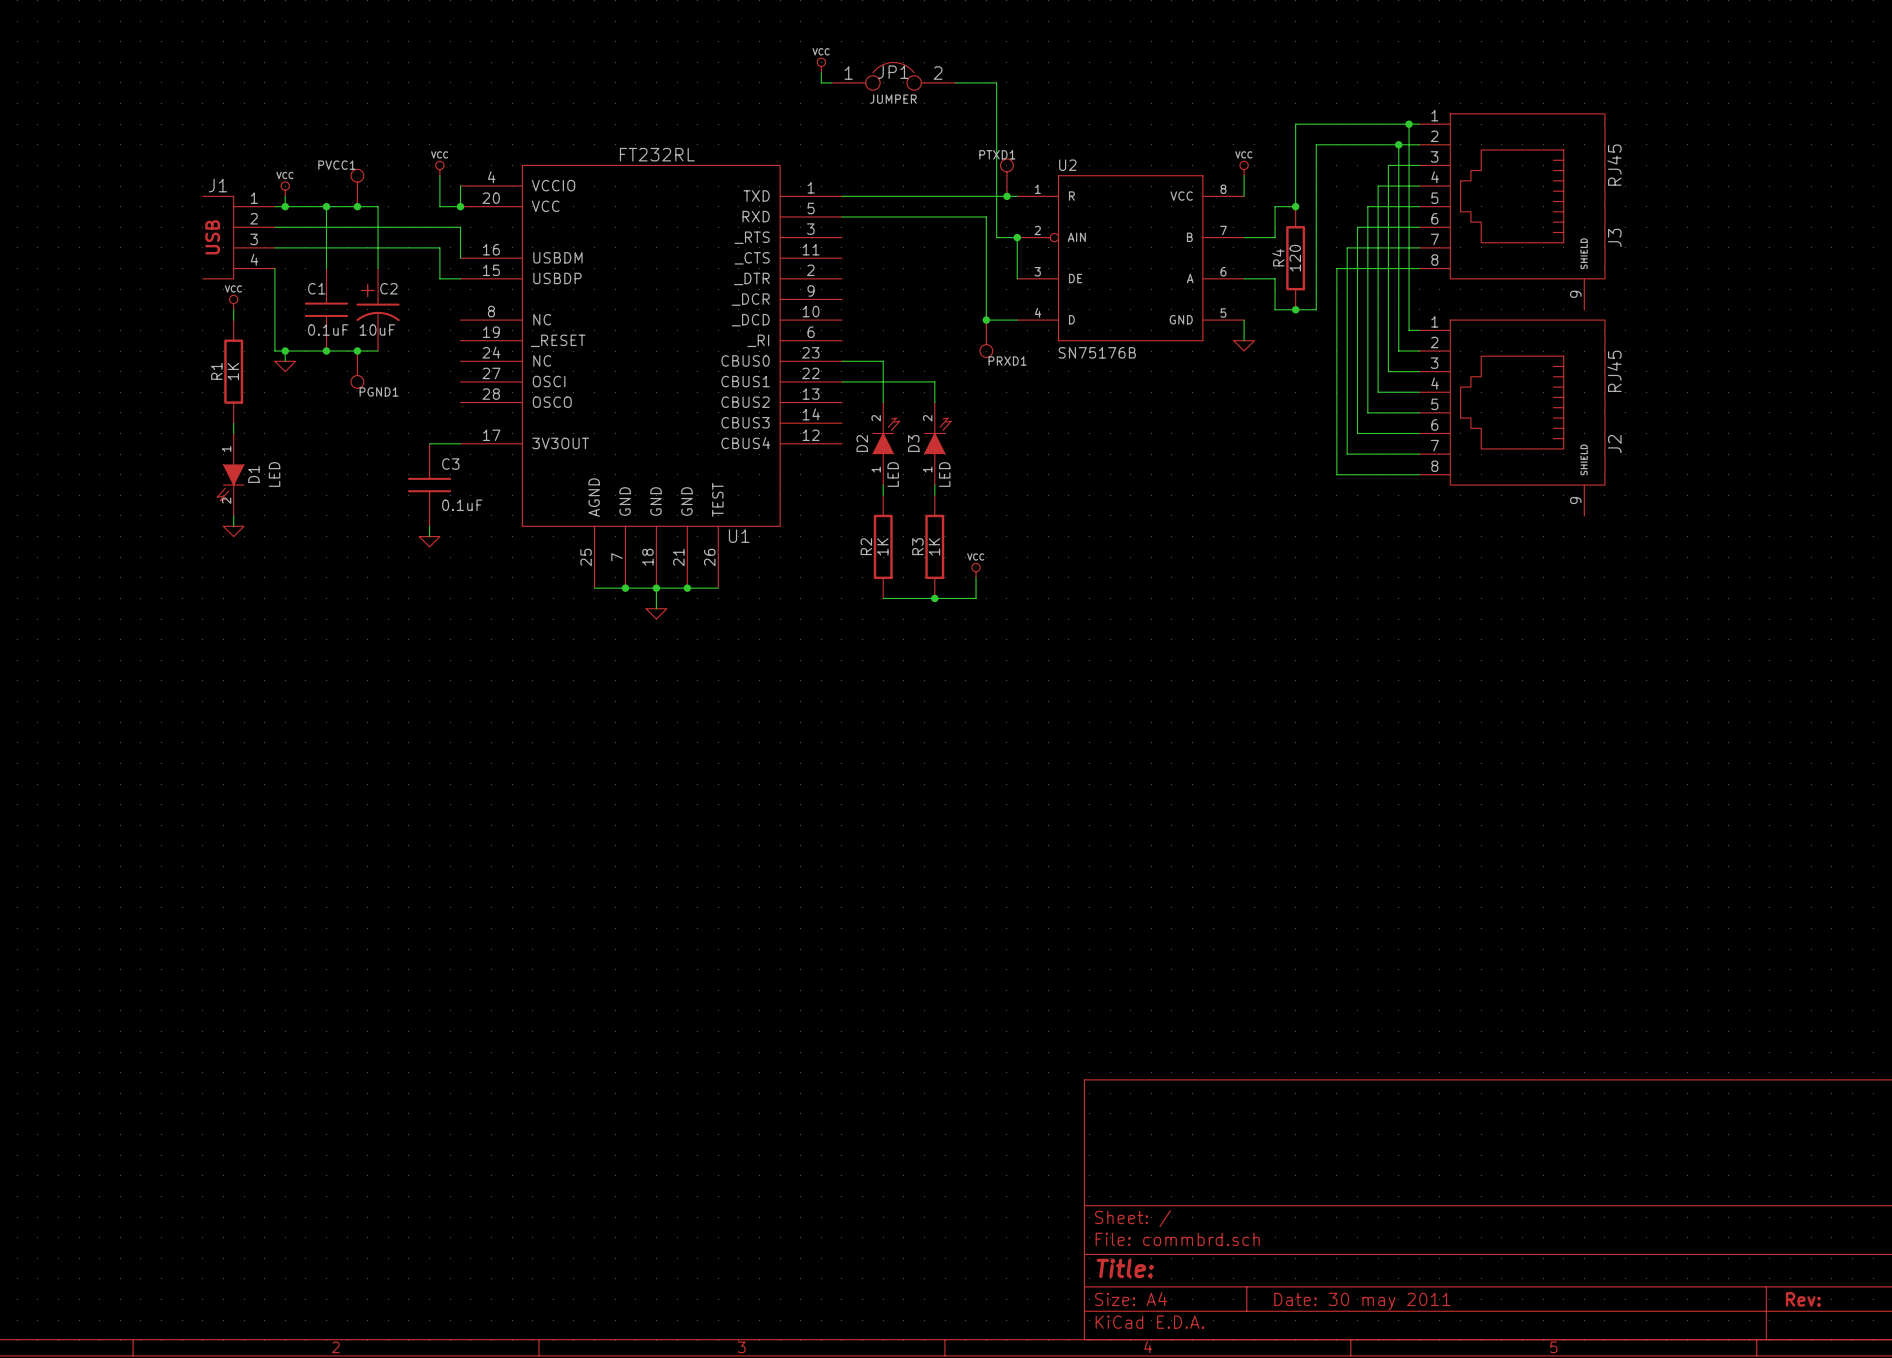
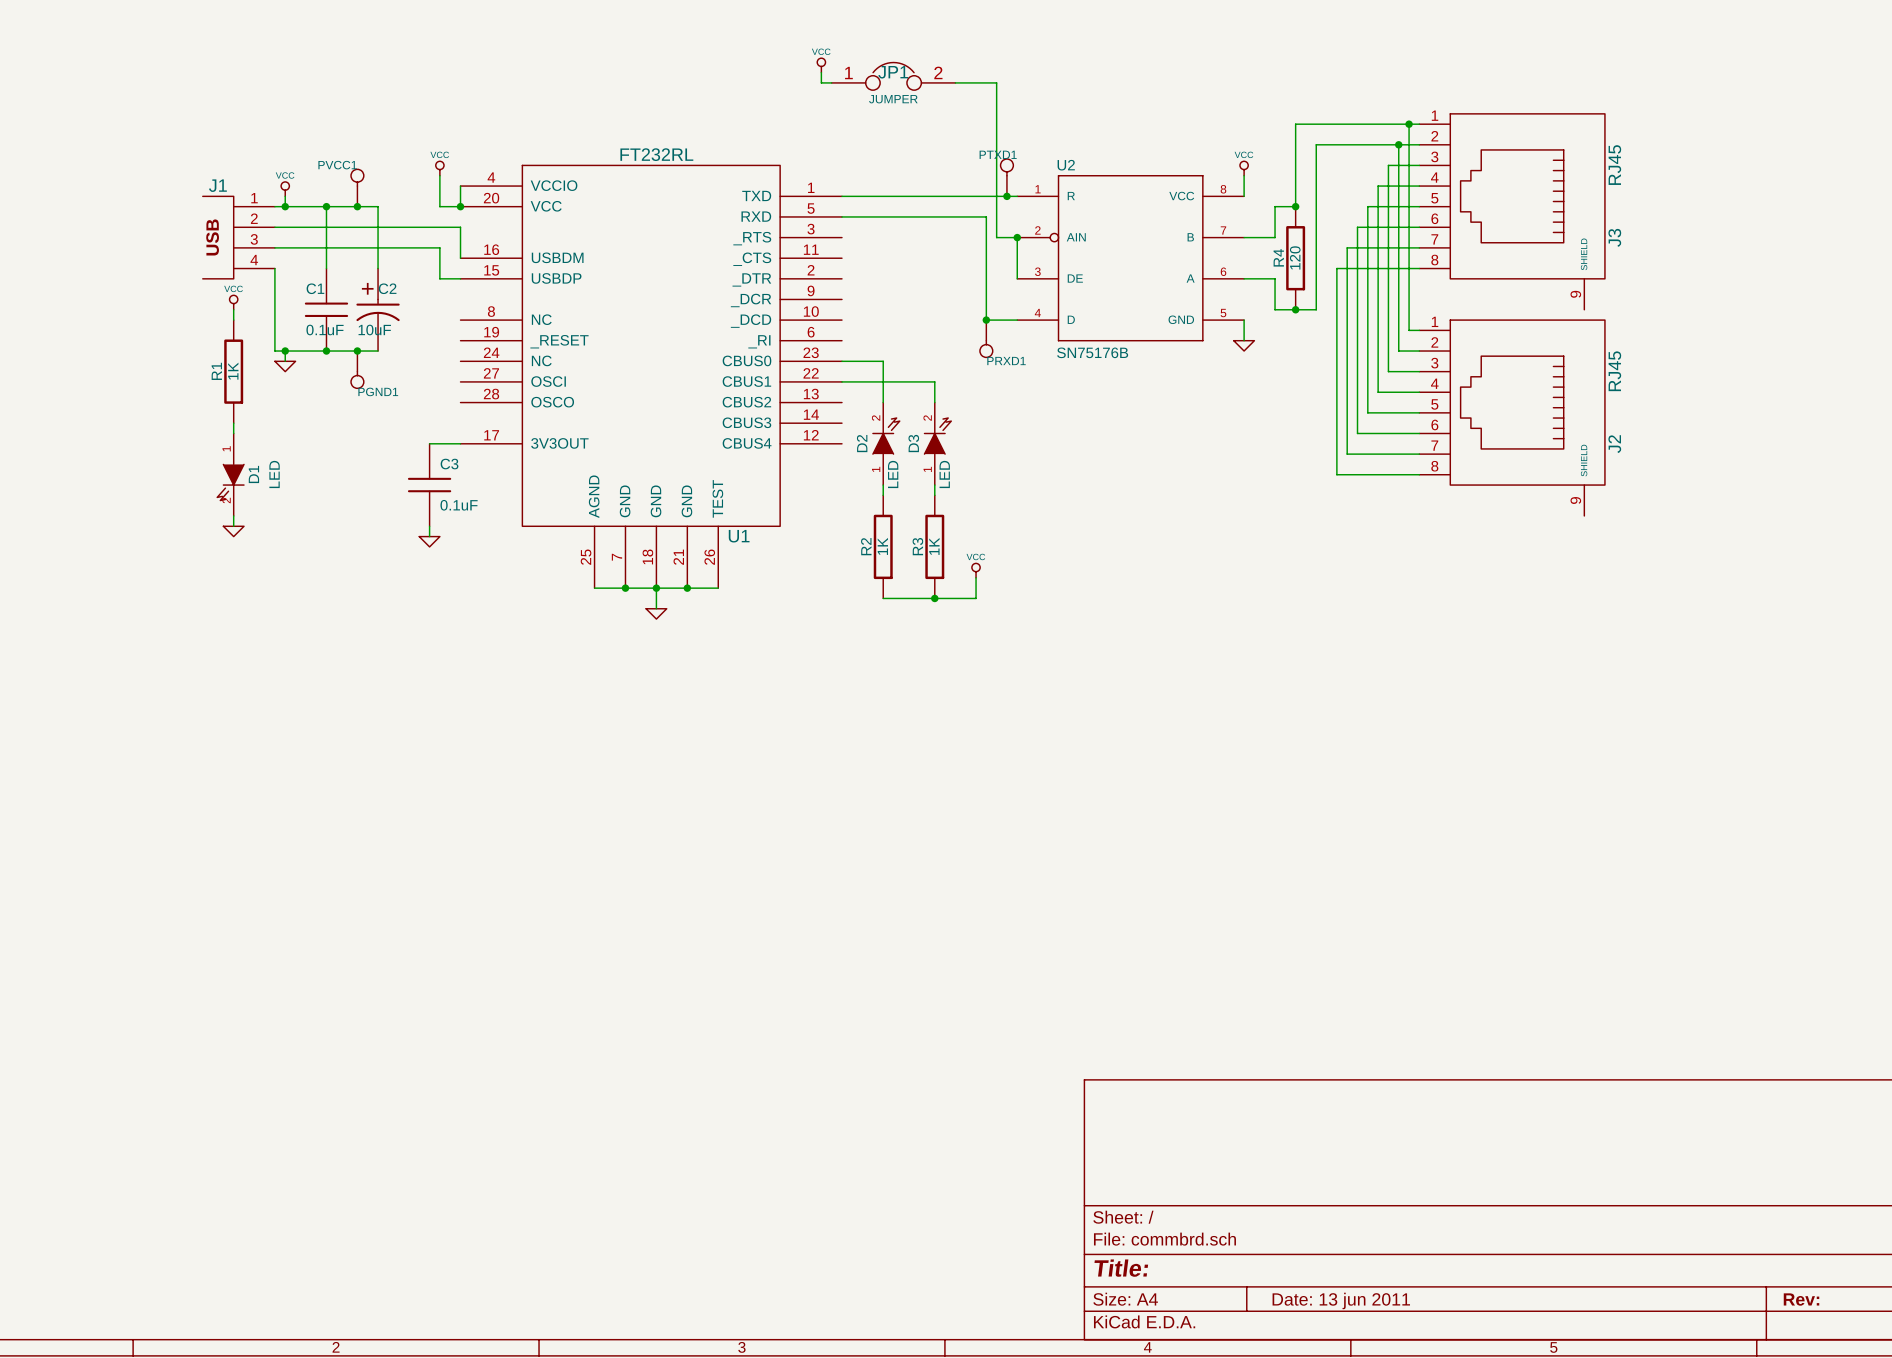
title block: Date: 30 may 2011 (1362, 1301) -> Date: 13 jun 2011 (1341, 1300)

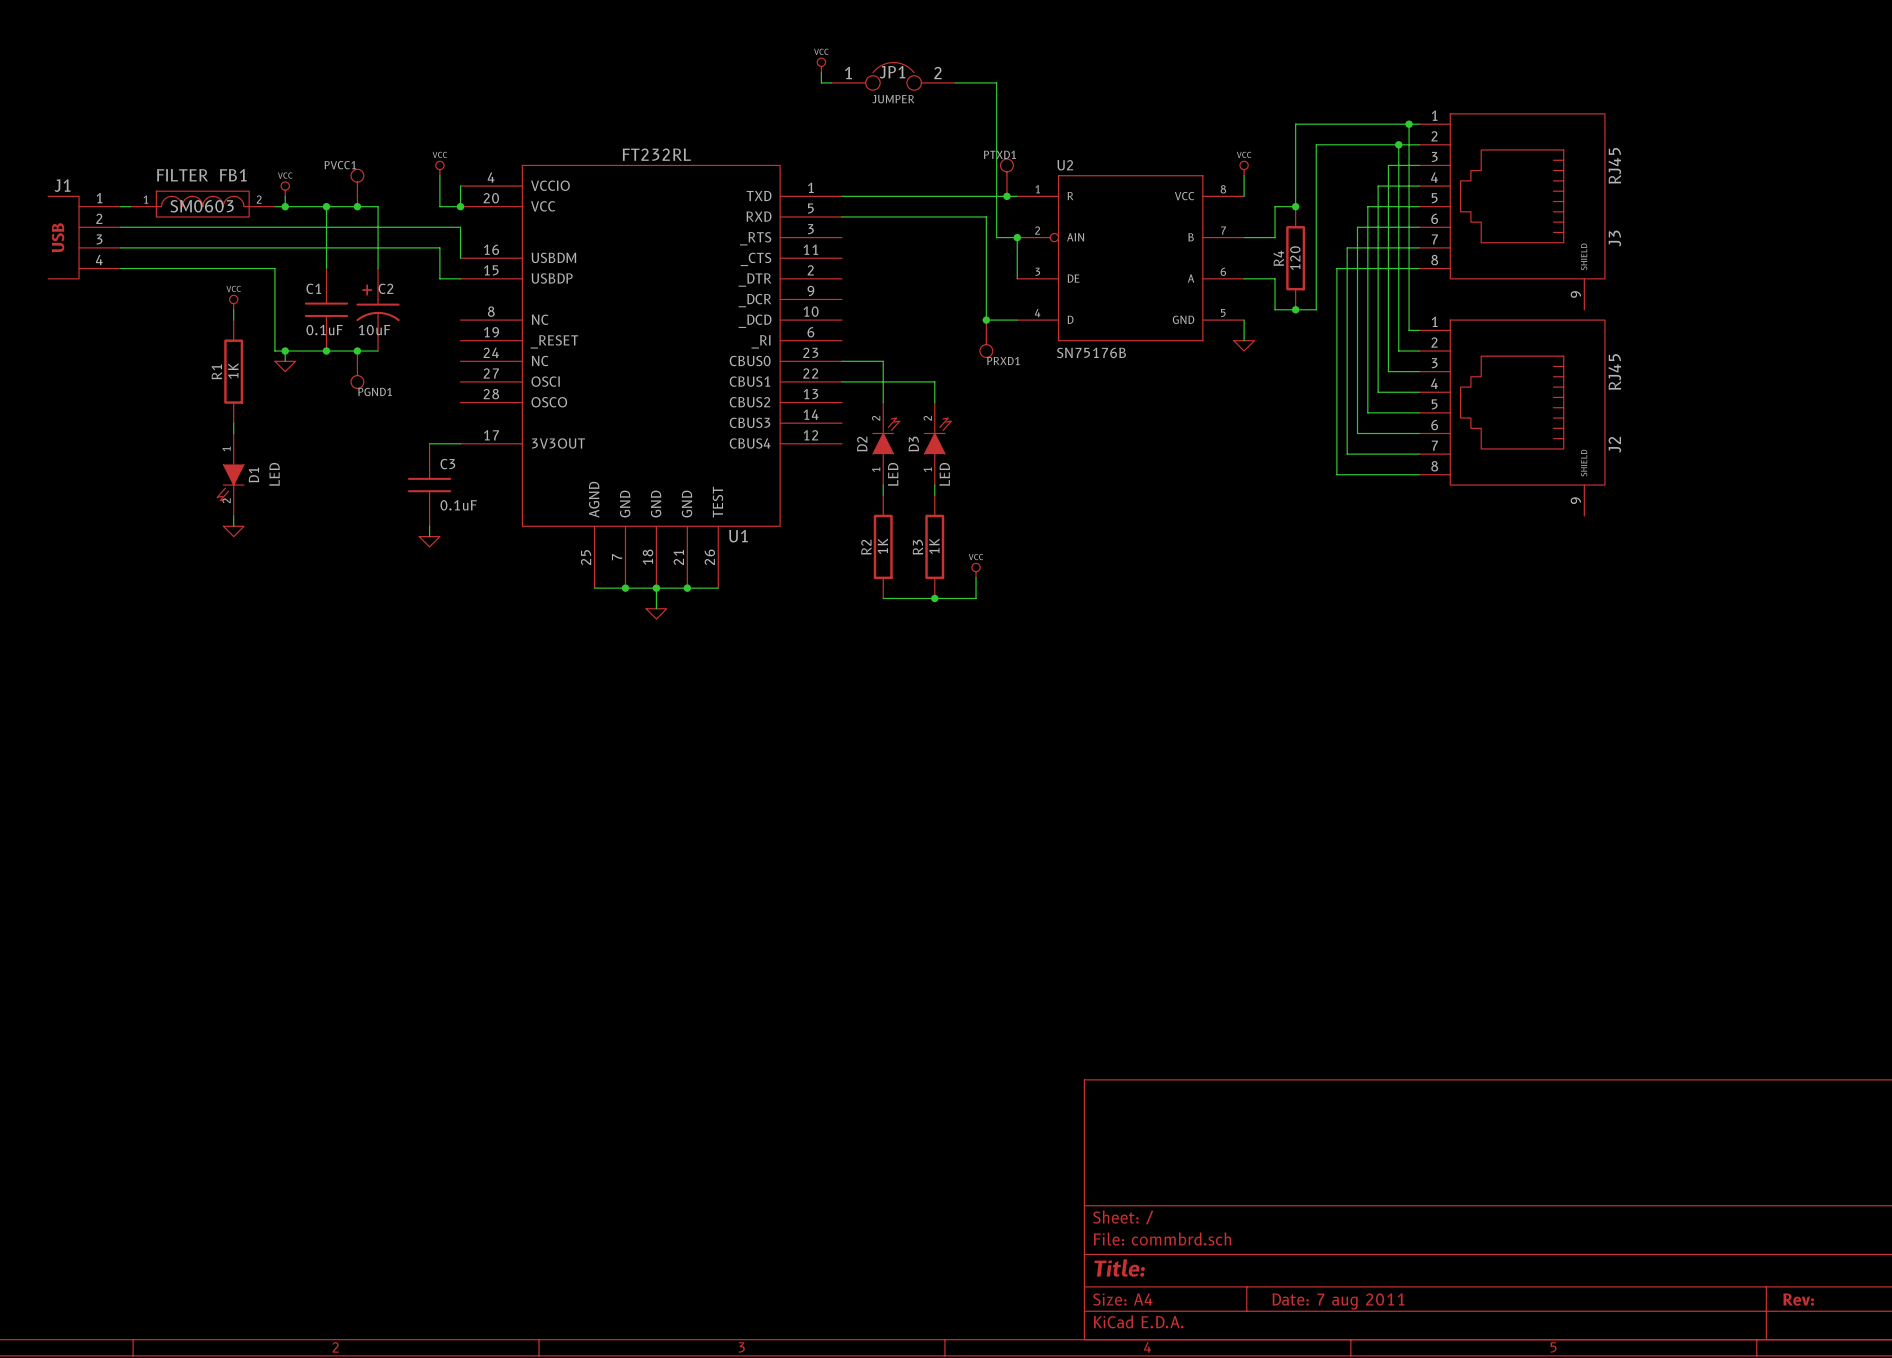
FB1: none -> FILTER (202, 204)
wire: none -> (120, 206) (130, 206)
wire: none -> (120, 227) (274, 227)
J1 position: (238, 237) -> (84, 237)
wire: none -> (120, 247) (274, 247)
wire: none -> (120, 268) (274, 268)
title block: Date: 13 jun 2011 (1341, 1300) -> Date: 7 aug 2011 (1338, 1301)

